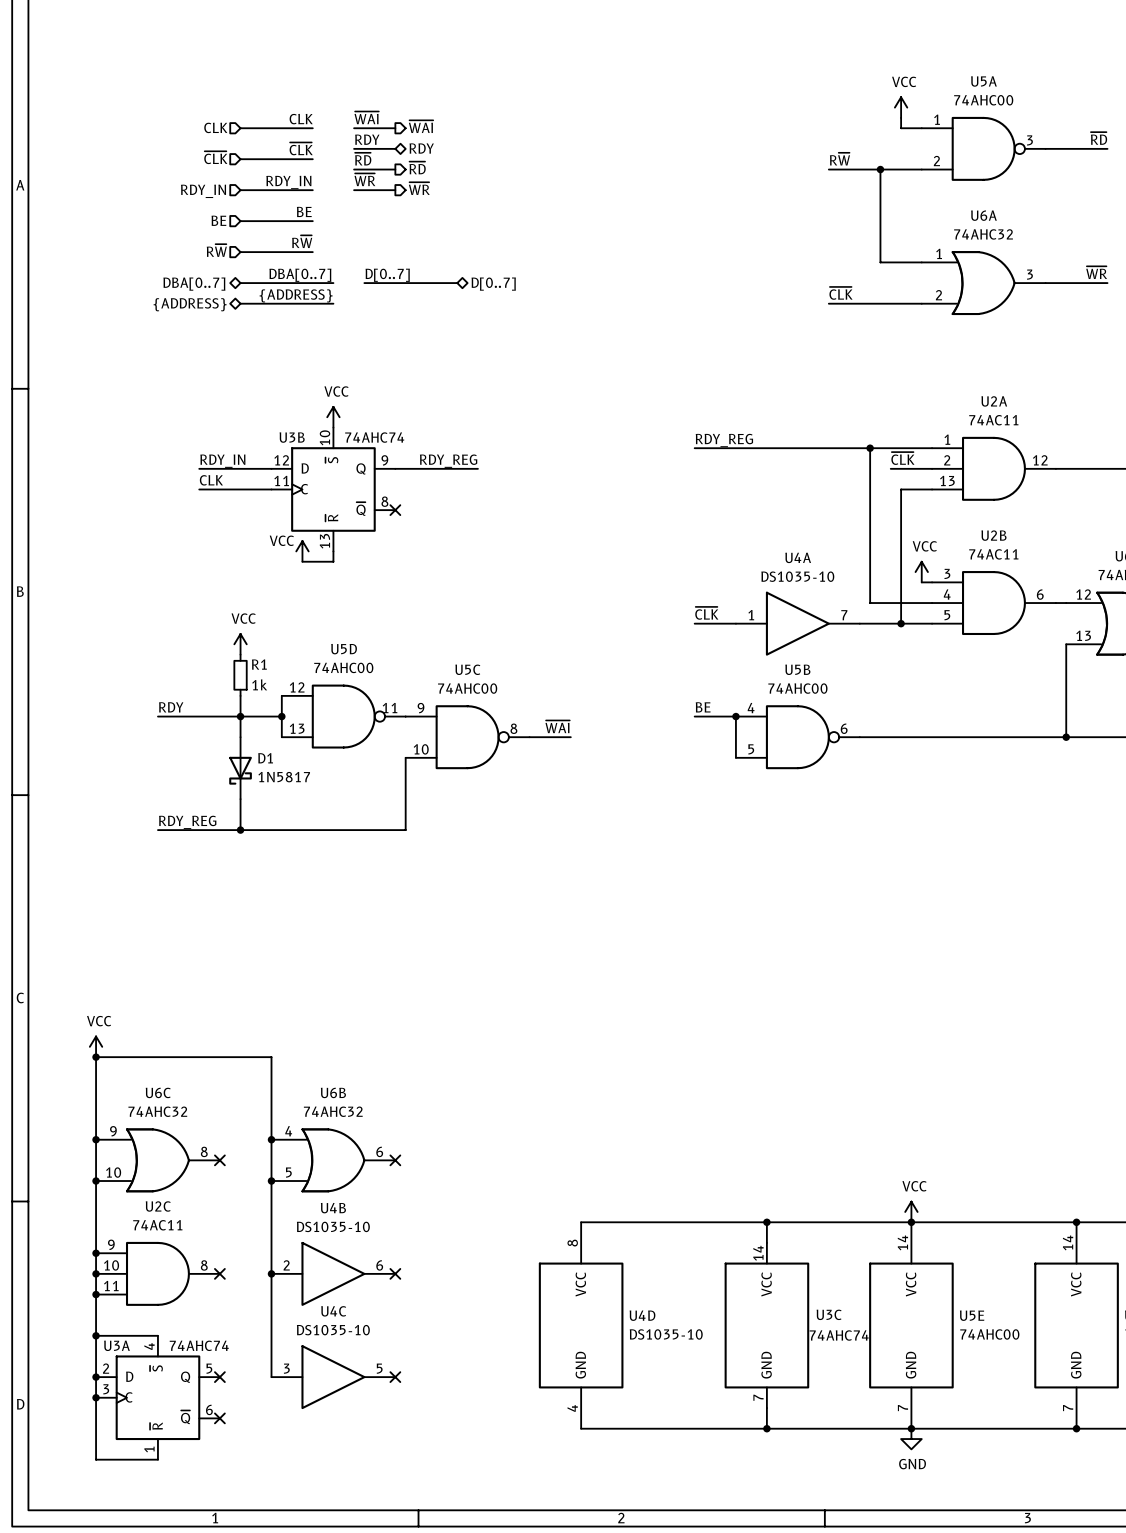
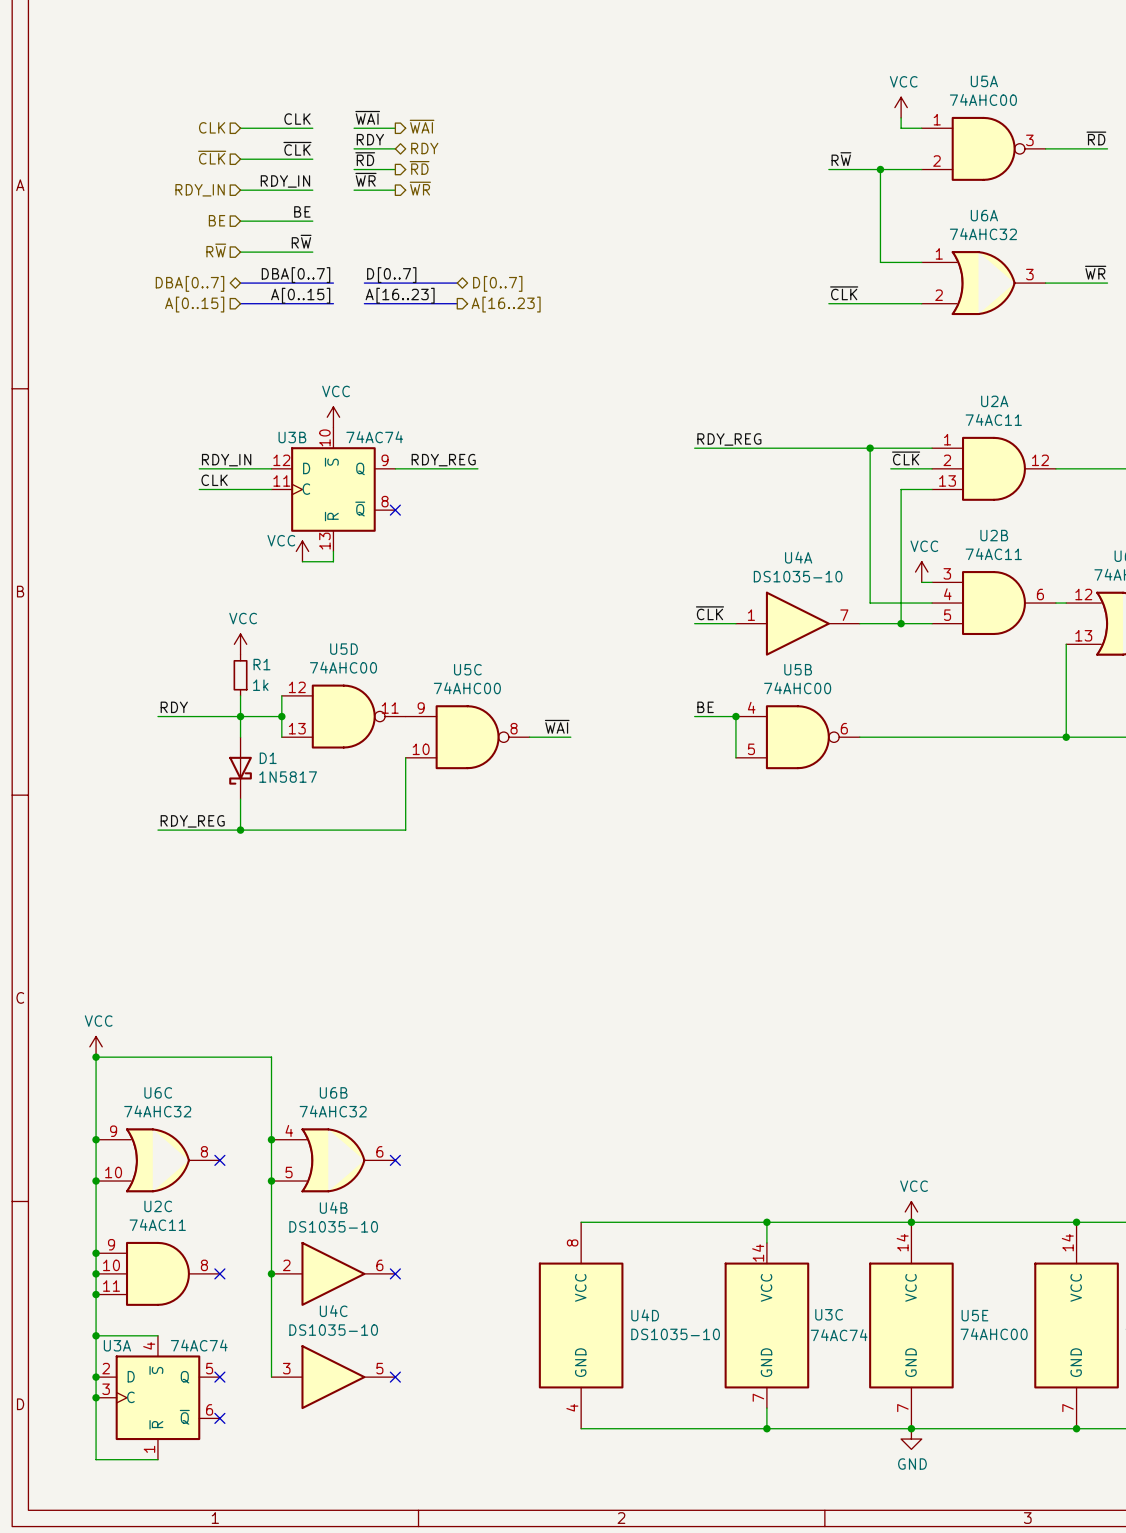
label: {ADDRESS} (296, 295) -> A[0..15] (300, 295)
label: none -> A[16..23] (400, 295)
bus: none -> (364, 303) (457, 303)
hierarchical label shape: bidirectional (190, 304) -> input (194, 304)
hierarchical label: {ADDRESS} (190, 304) -> A[0..15] (194, 304)
hierarchical label: none -> A[16..23] (506, 304)
U3B value: 74AHC74 (374, 437) -> 74AC74 (374, 437)
U3C value: 74AHC74 (839, 1335) -> 74AC74 (839, 1335)
U3A value: 74AHC74 (199, 1345) -> 74AC74 (199, 1345)

